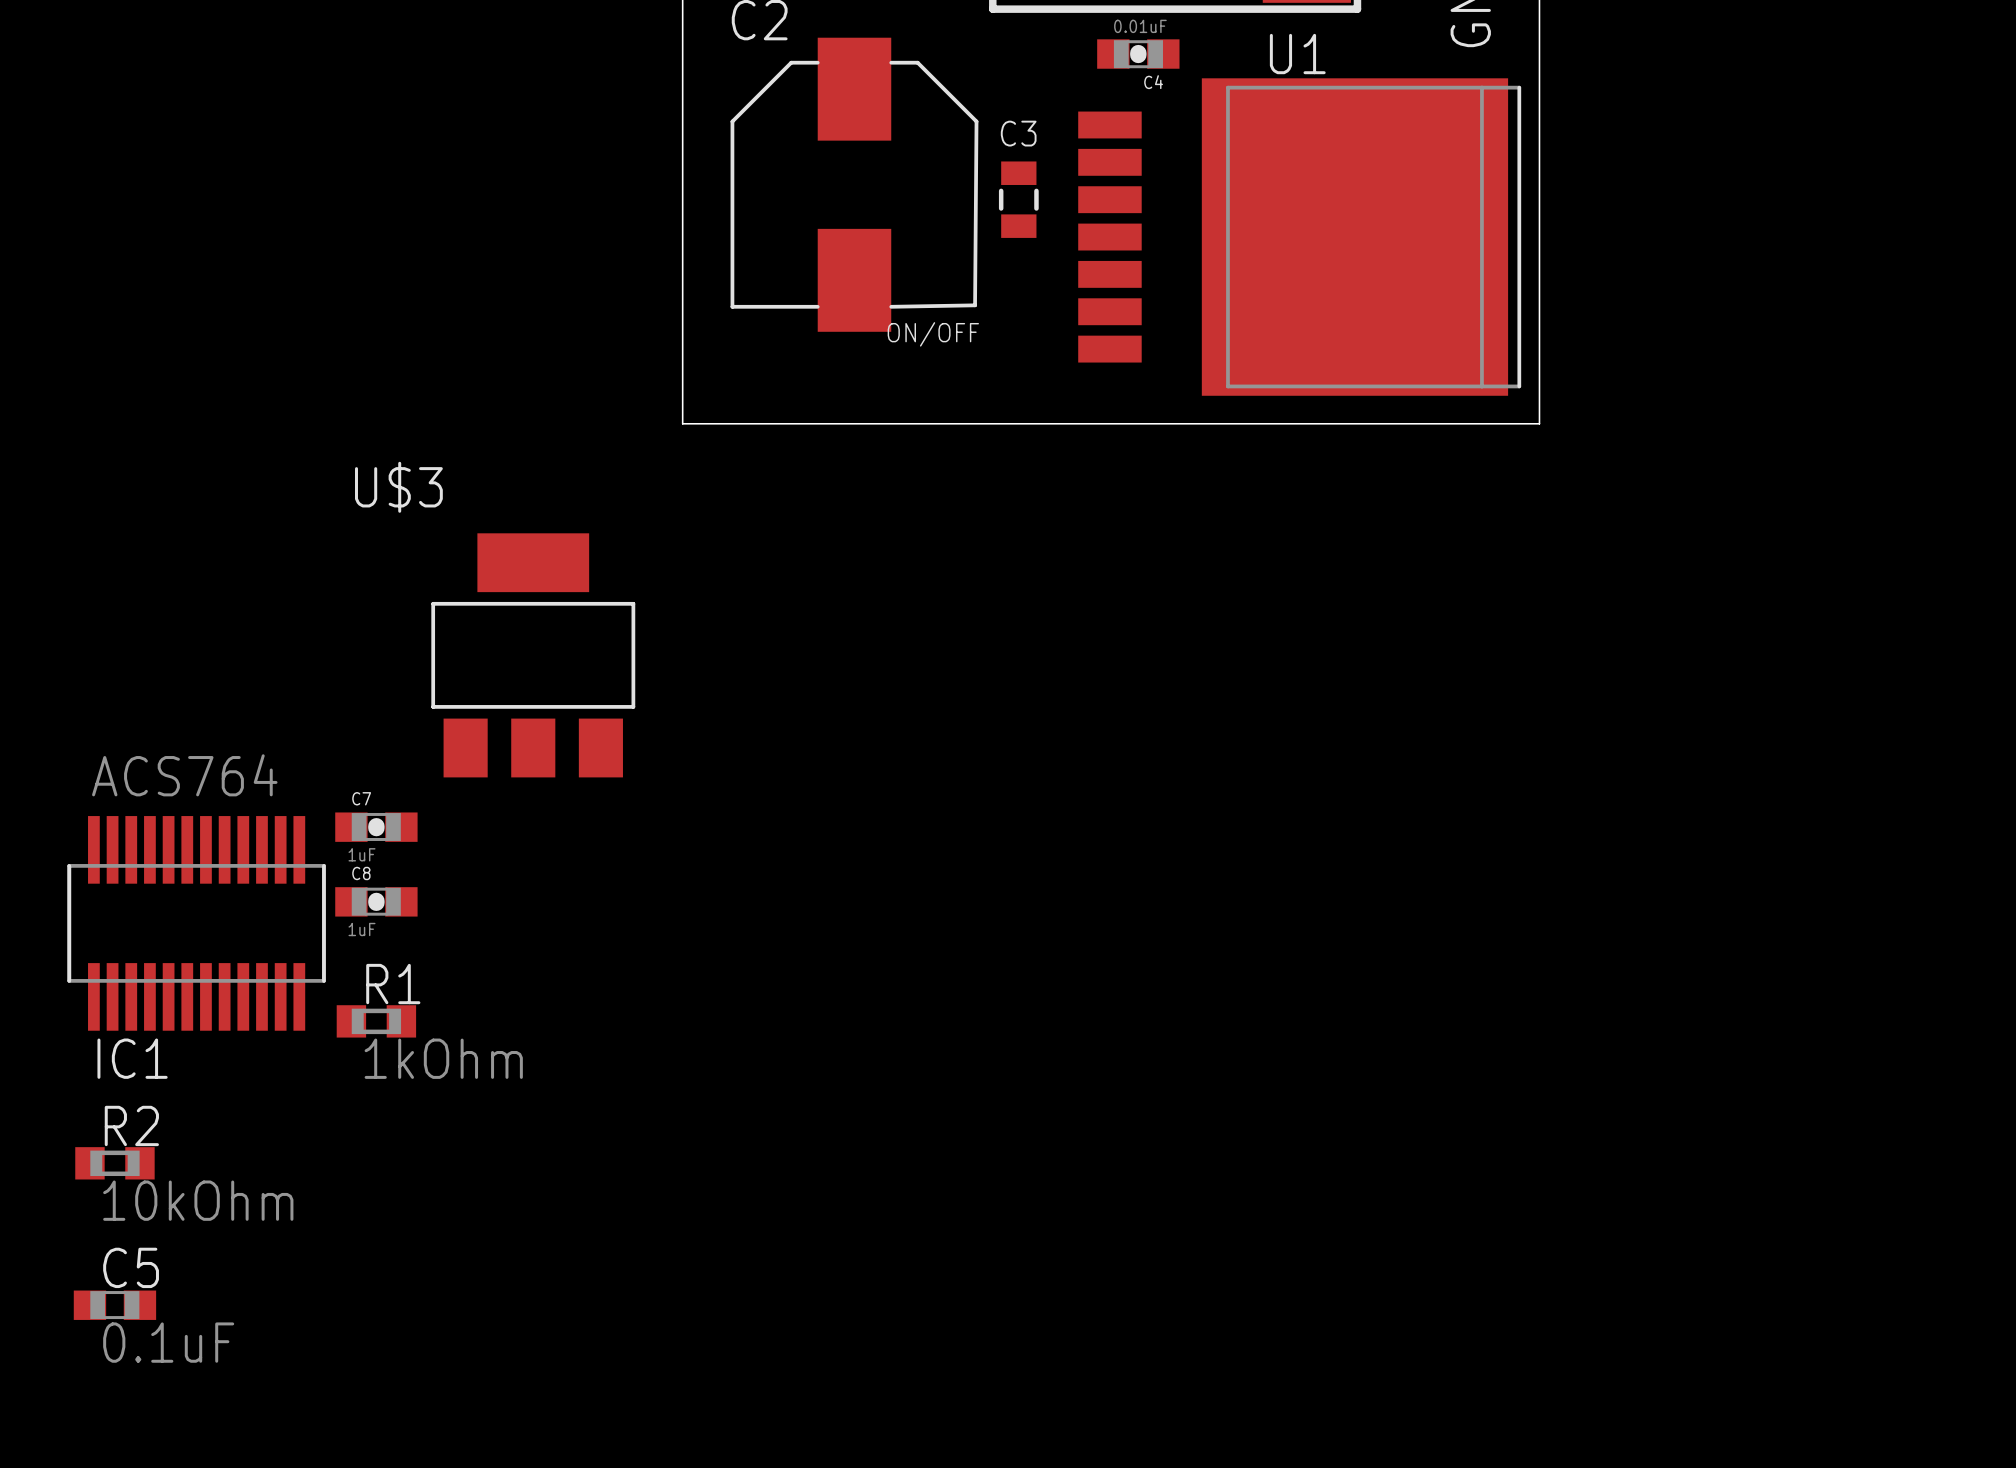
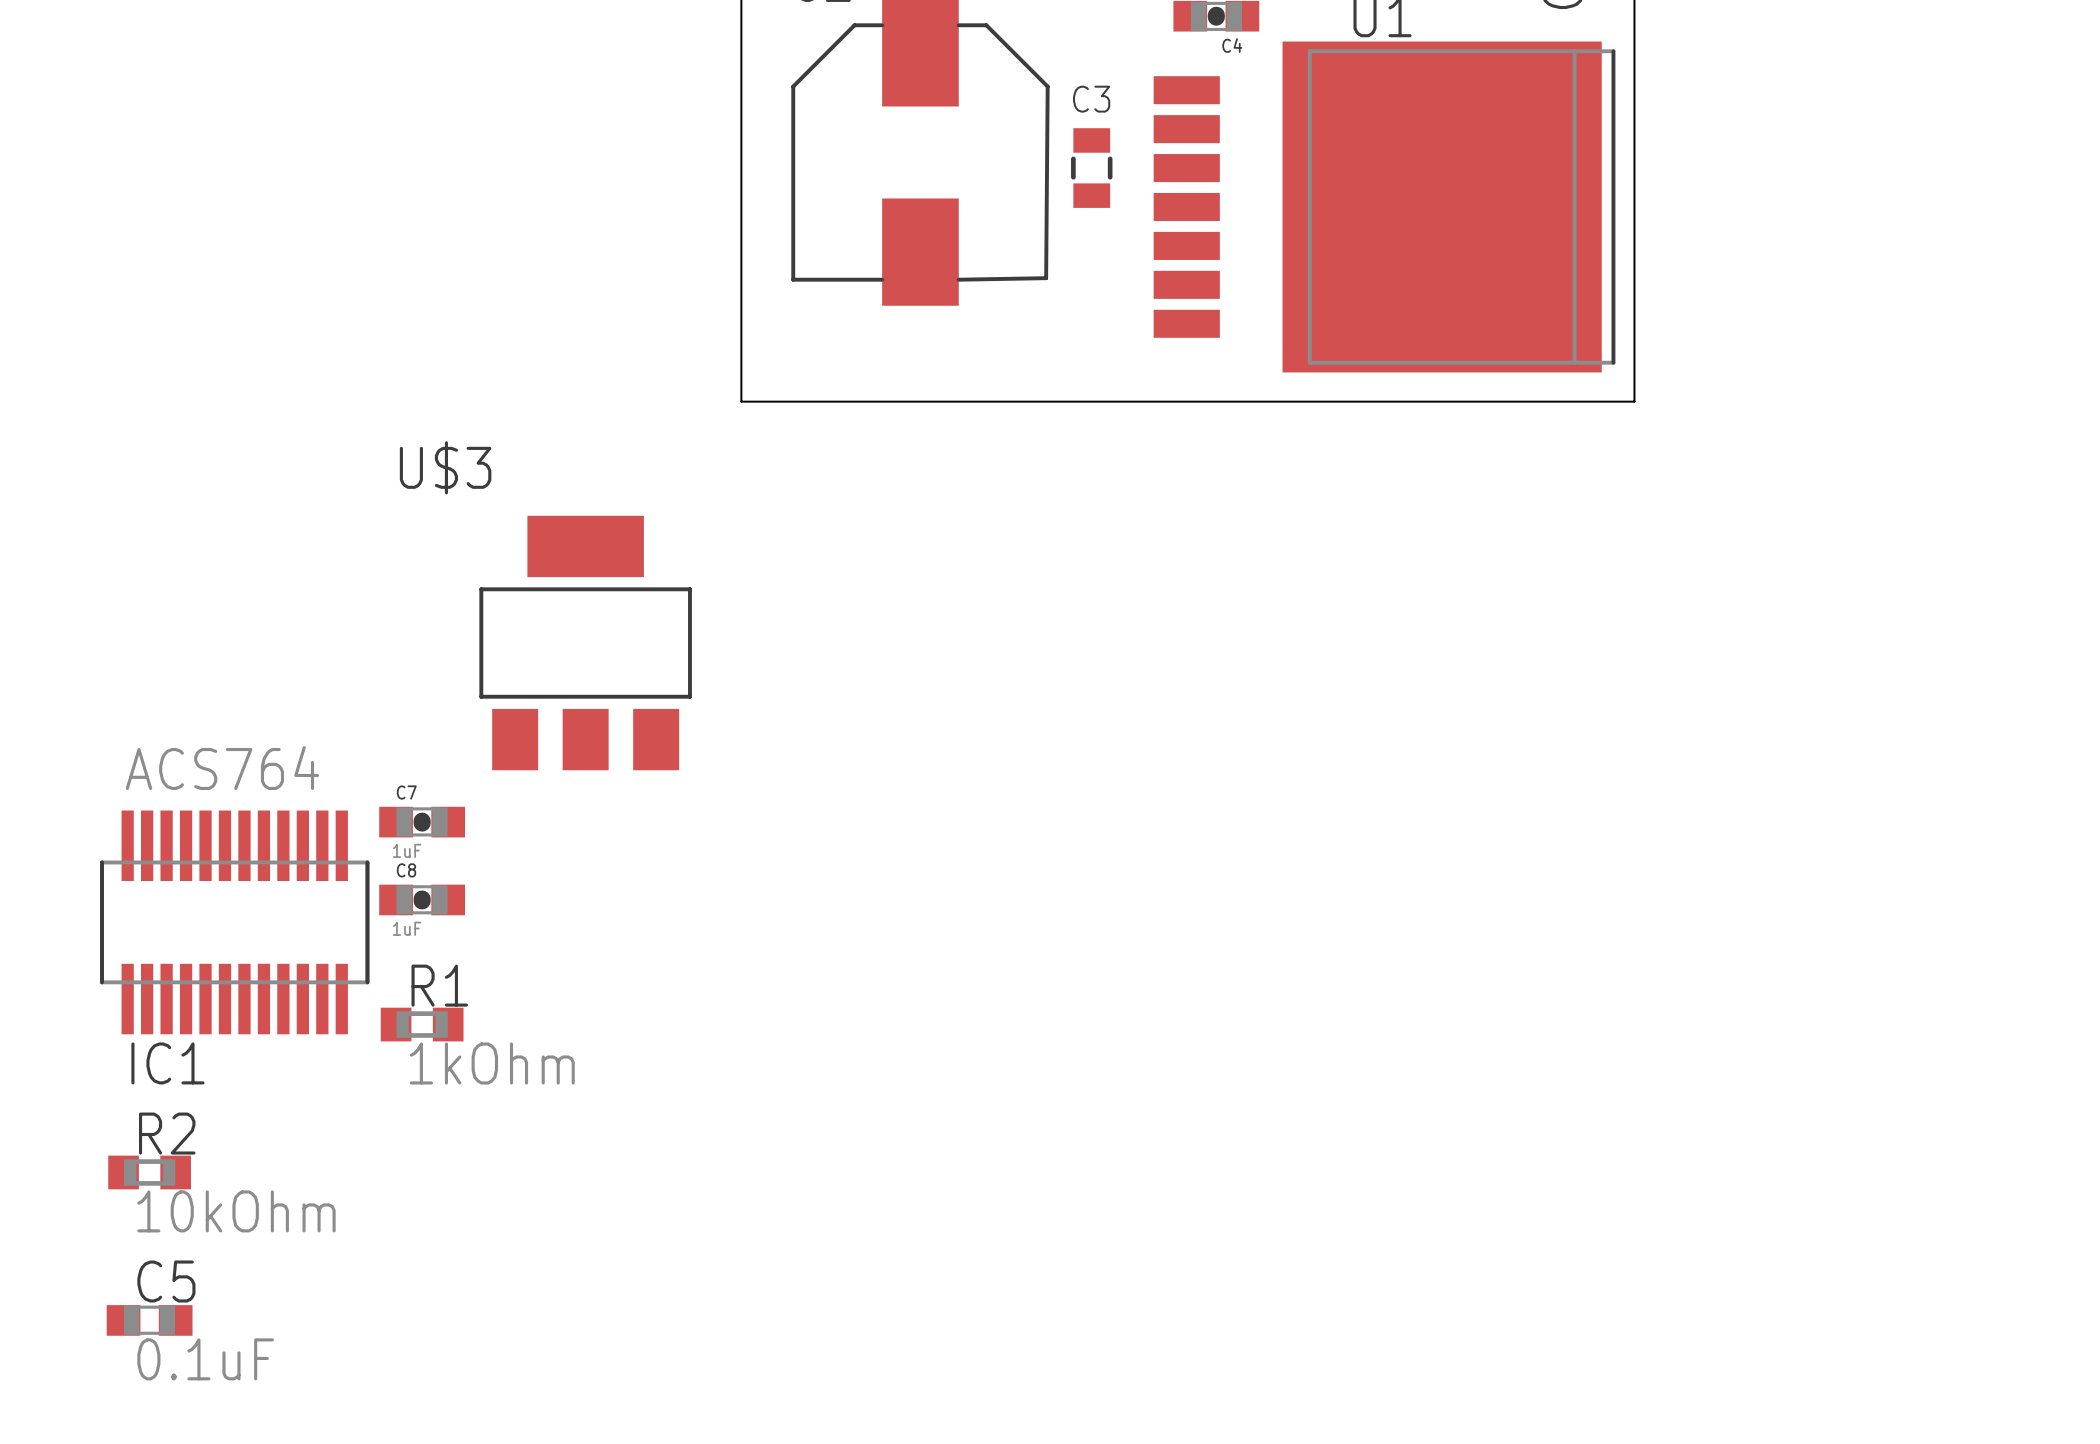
text: ON/OFF (933, 334) -> none

